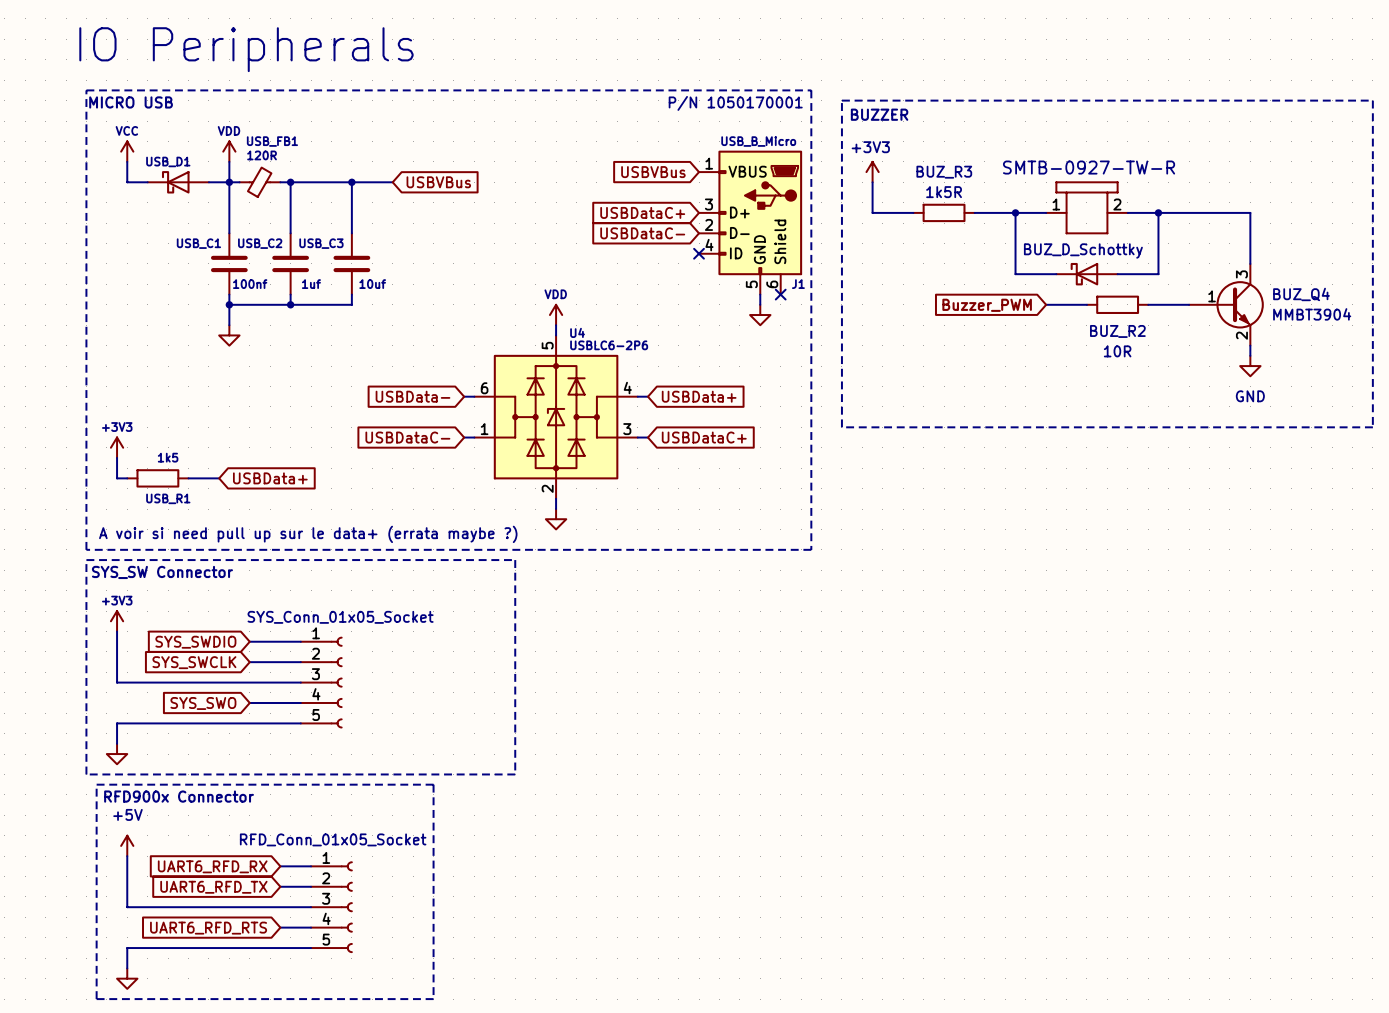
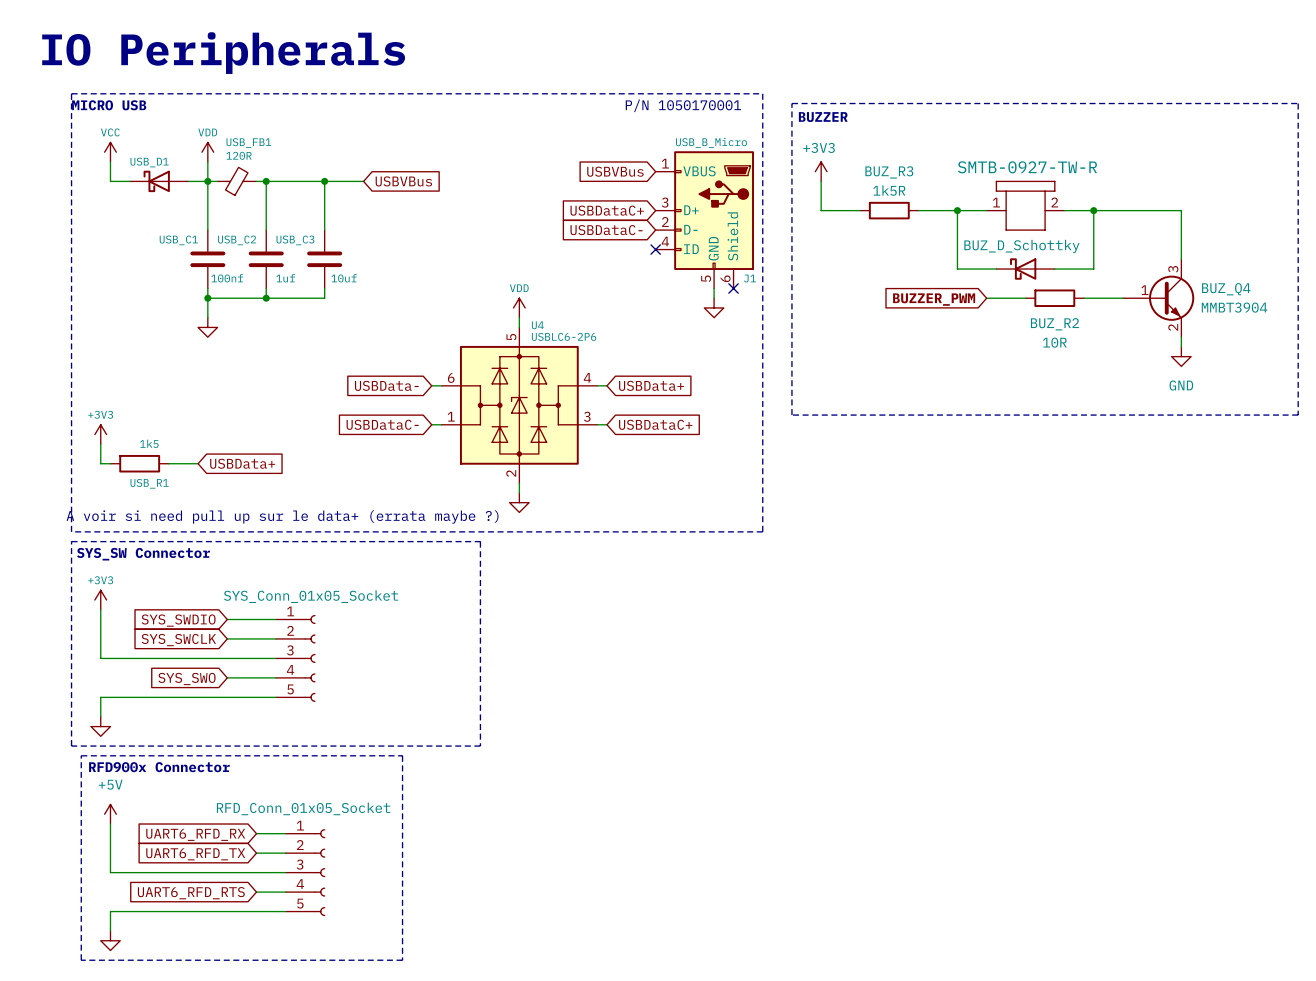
global label: Buzzer_PWM (987, 305) -> BUZZER_PWM (934, 299)

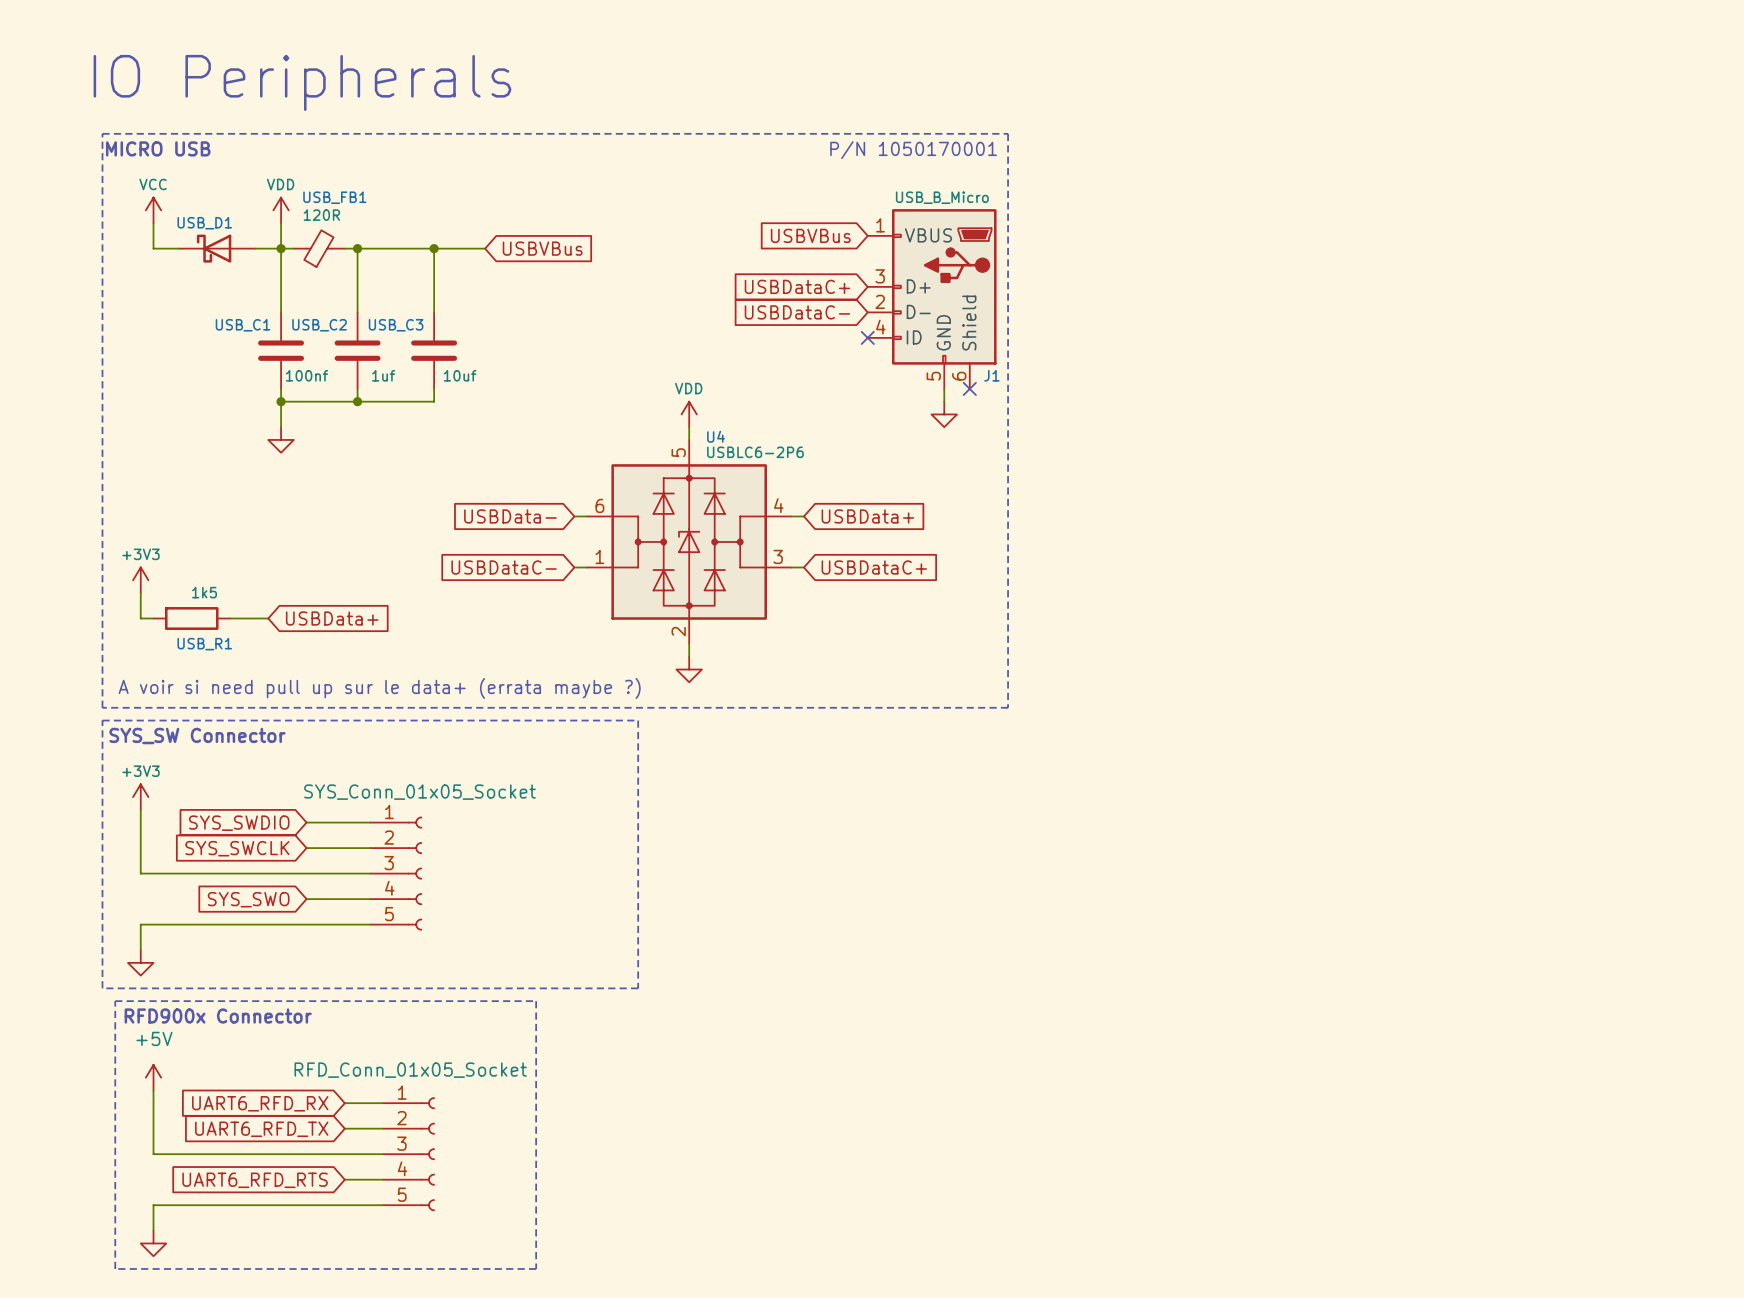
line: (791, 103) (1298, 103) (1298, 415) (791, 415) (791, 103) -> none
text: BUZZER (823, 117) -> none
power symbol: +3V3 (821, 171) -> none
wire: (821, 181) (821, 210) (860, 210) -> none
part: SMTB-0927-TW-R (1025, 205) -> none
BUZ_R3: 1k5R (889, 210) -> none
wire: (918, 210) (986, 210) -> none
wire: (957, 210) (957, 269) (996, 269) -> none
junction: (957, 210) -> none
wire: (1064, 210) (1181, 210) (1181, 259) -> none
wire: (1093, 210) (1093, 269) (1054, 269) -> none
junction: (1093, 210) -> none
part: BUZ_D_Schottky (1025, 269) -> none
wire: (986, 298) (1025, 298) -> none
BUZ_R2: 10R (1054, 298) -> none
wire: (1084, 298) (1122, 298) -> none
BUZ_Q4: MMBT3904 (1158, 298) -> none
global label: BUZZER_PWM (934, 299) -> none
wire: (1181, 337) (1181, 346) -> none
power symbol: GND (1181, 356) -> none

